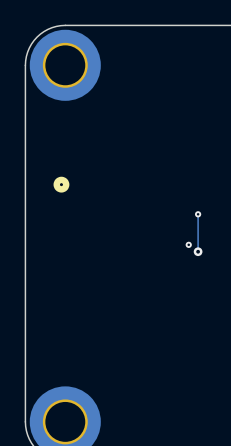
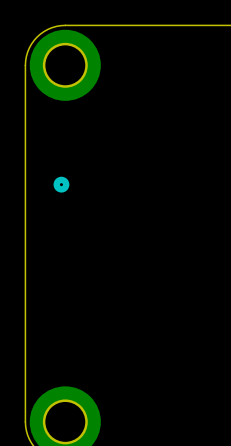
track: (198, 214) (198, 251) -> none
via: (198, 214) -> none
via: (188, 244) -> none
via: (198, 251) -> none

